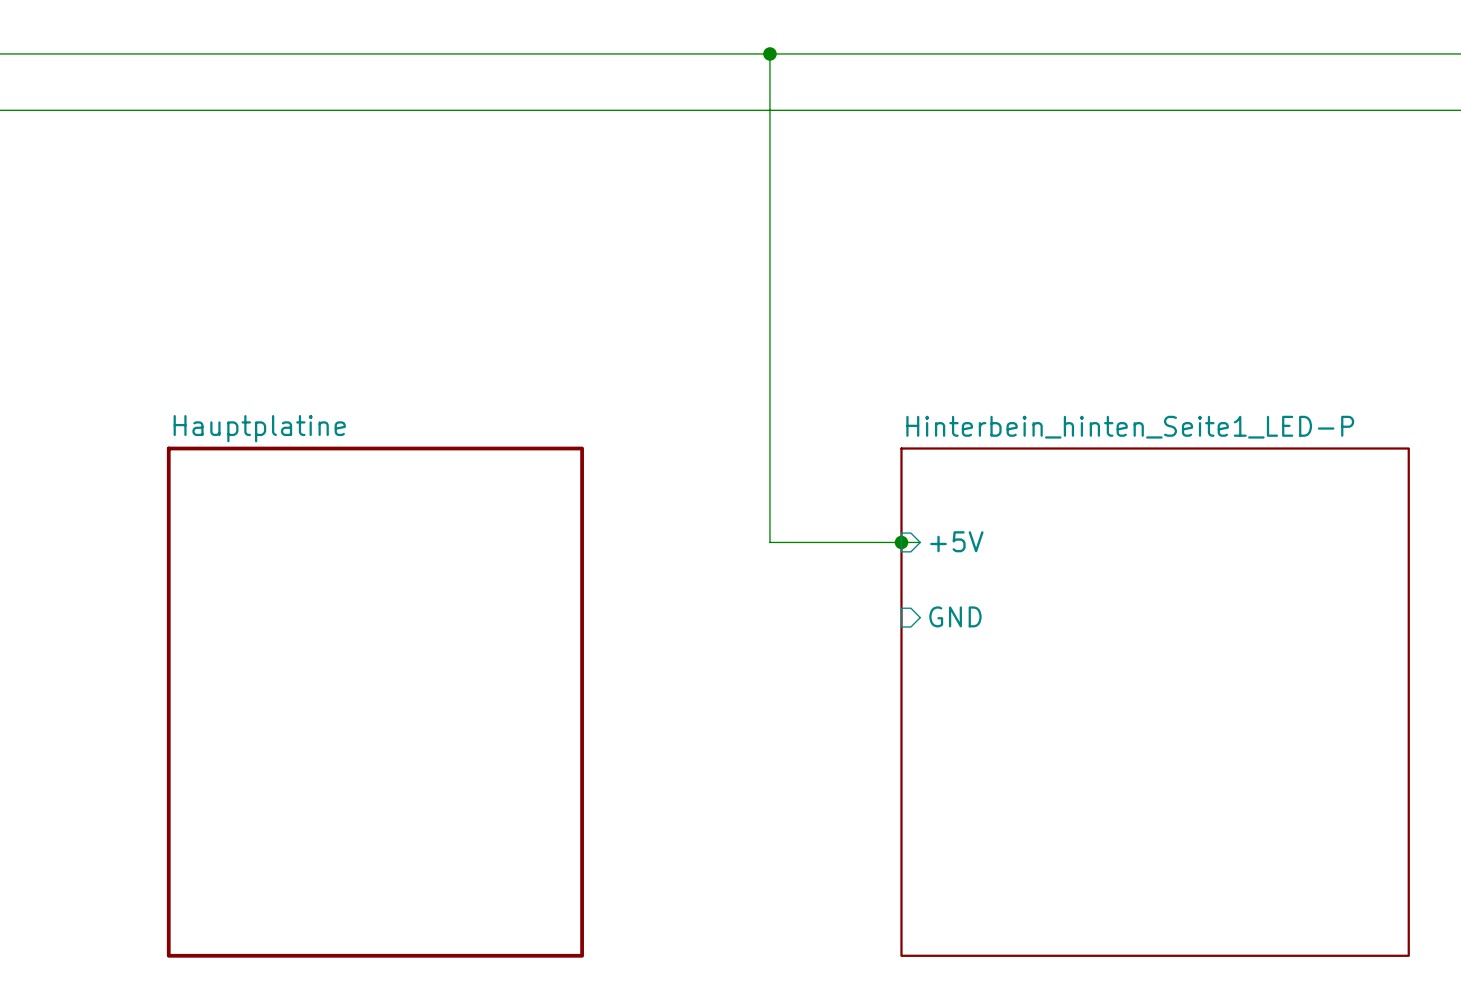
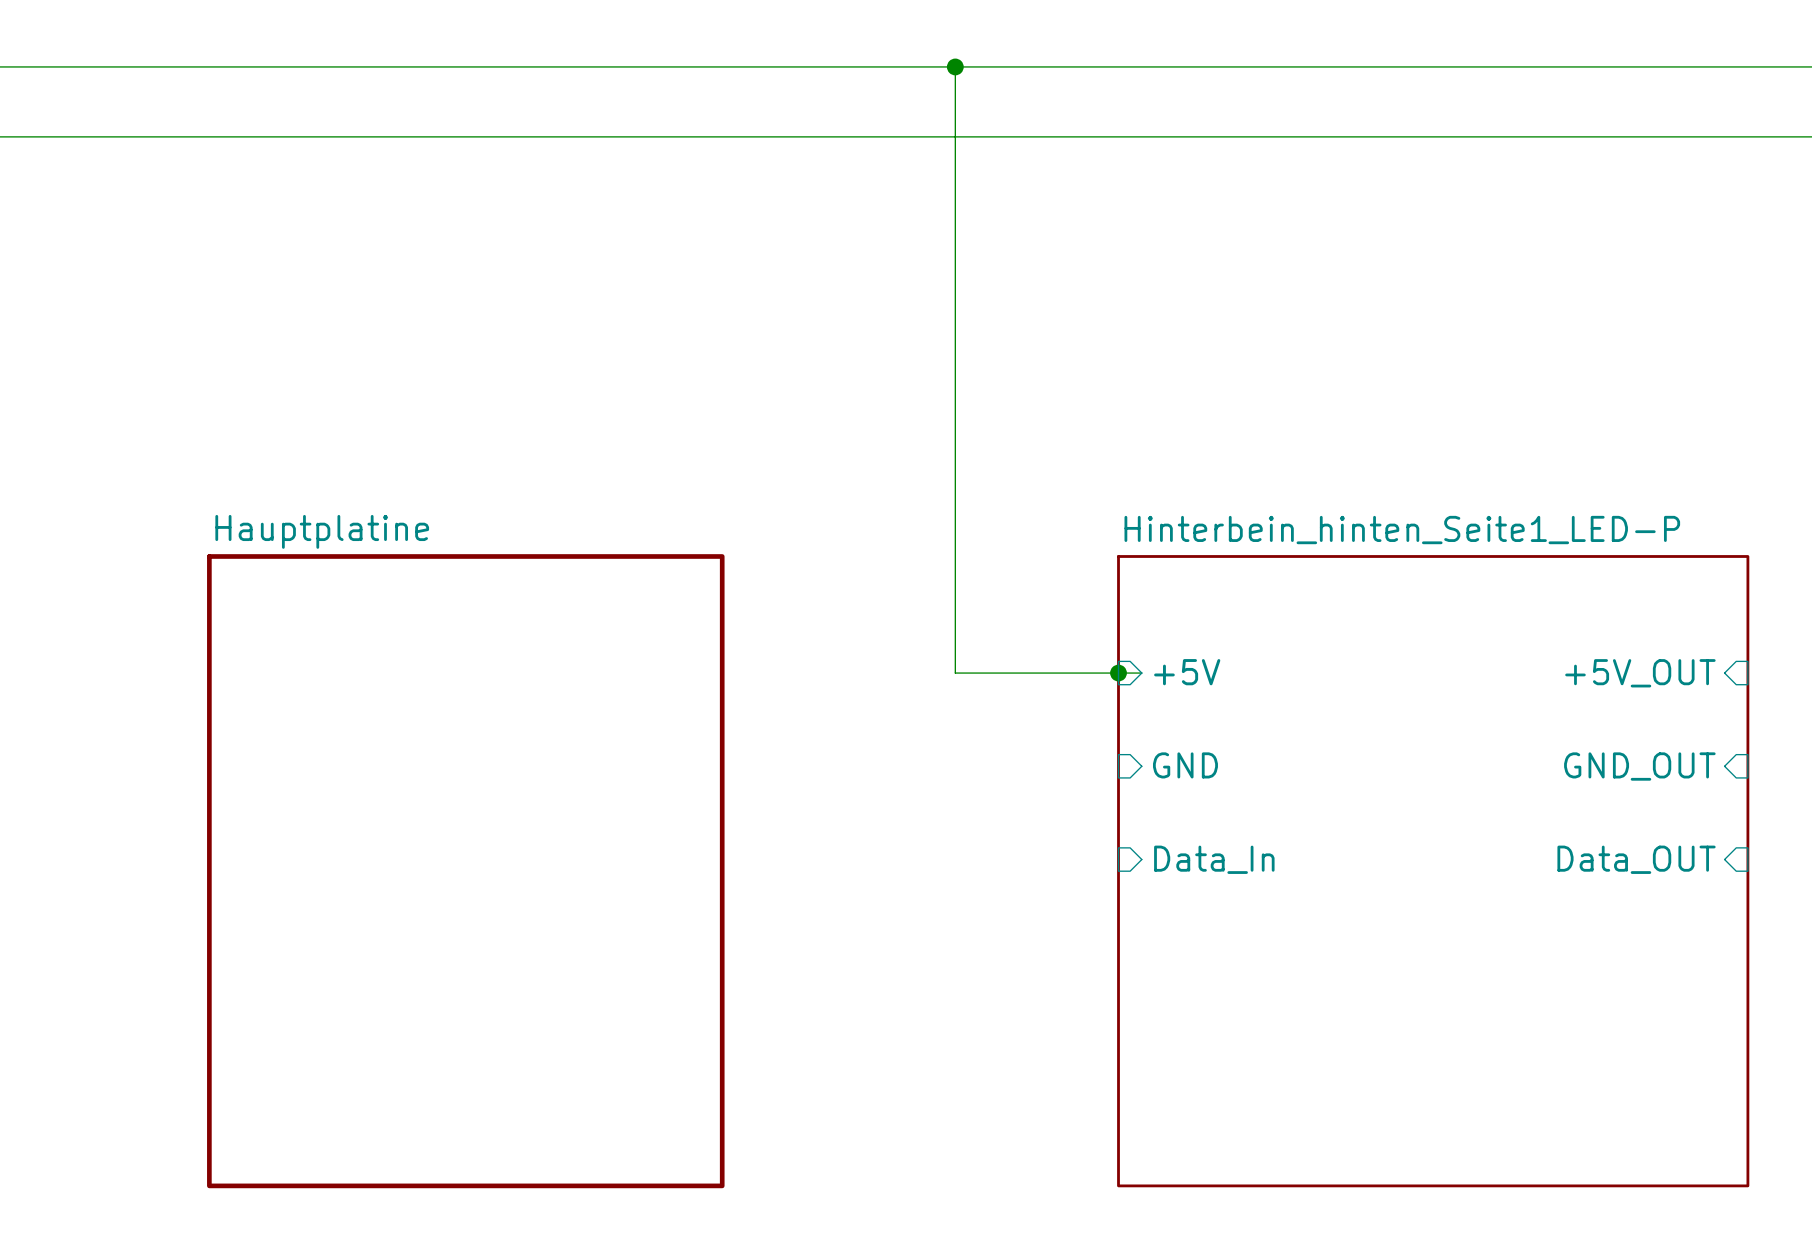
sheet pin: none -> +5V_OUT (1640, 673)
sheet pin: none -> GND_OUT (1639, 766)
sheet pin: none -> Data_In (1214, 859)
sheet pin: none -> Data_OUT (1636, 859)

